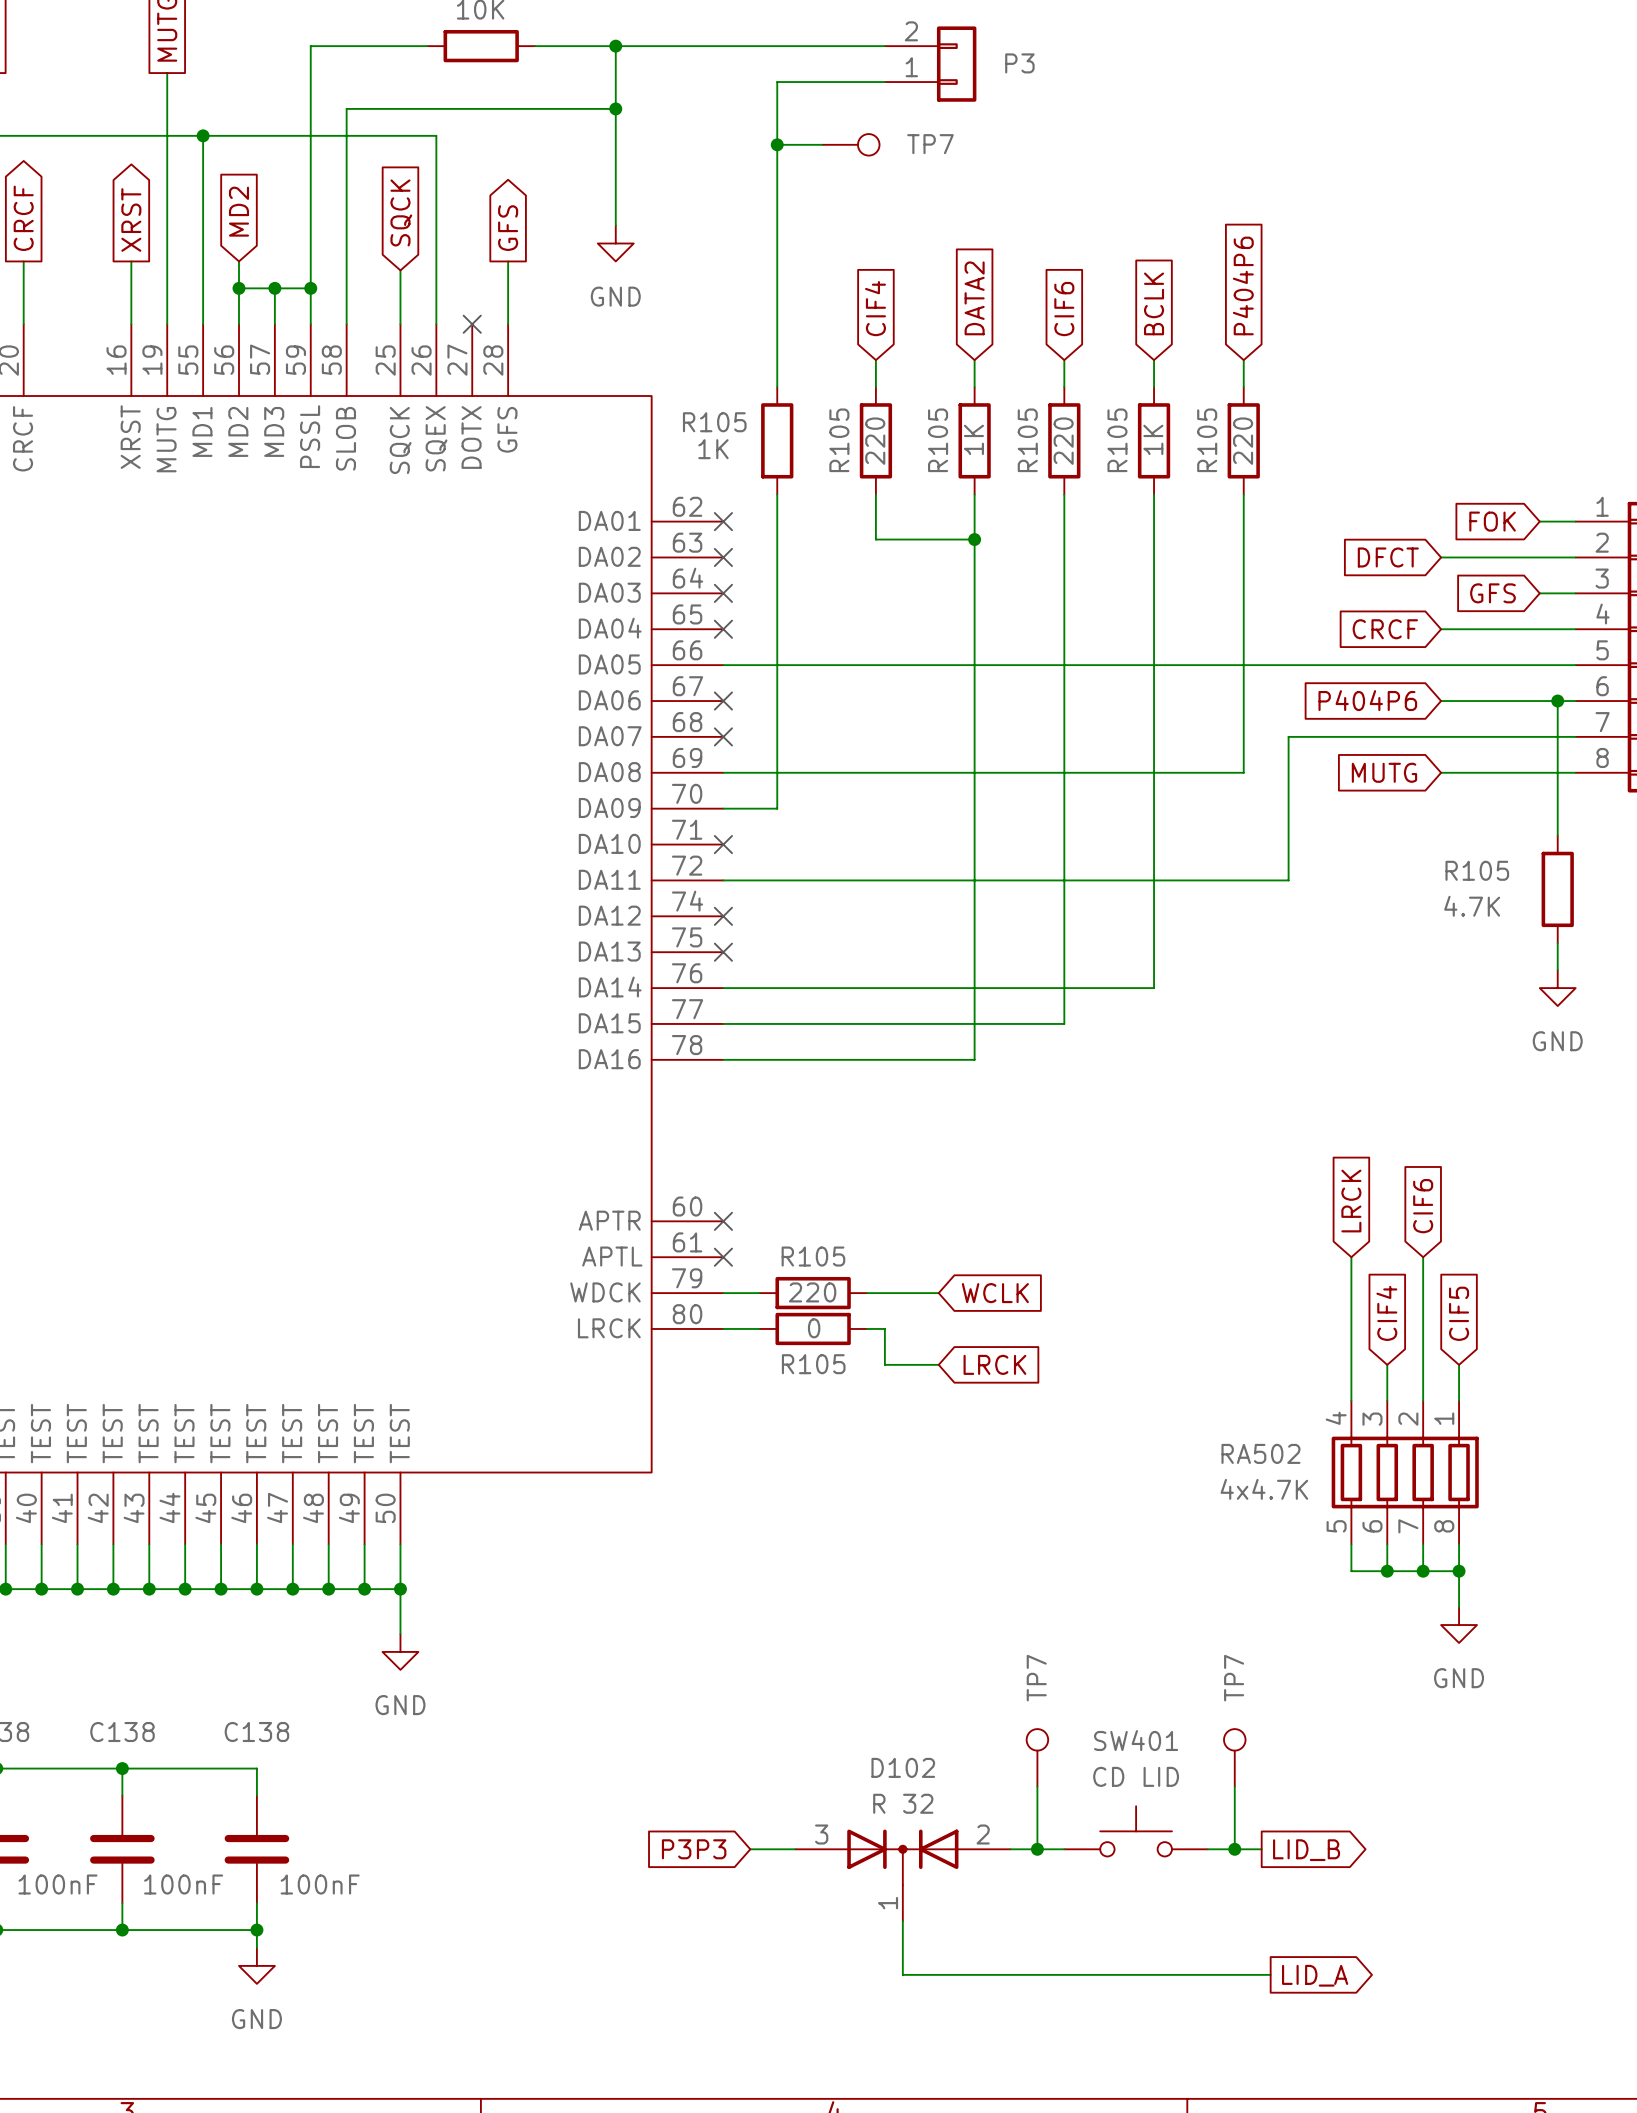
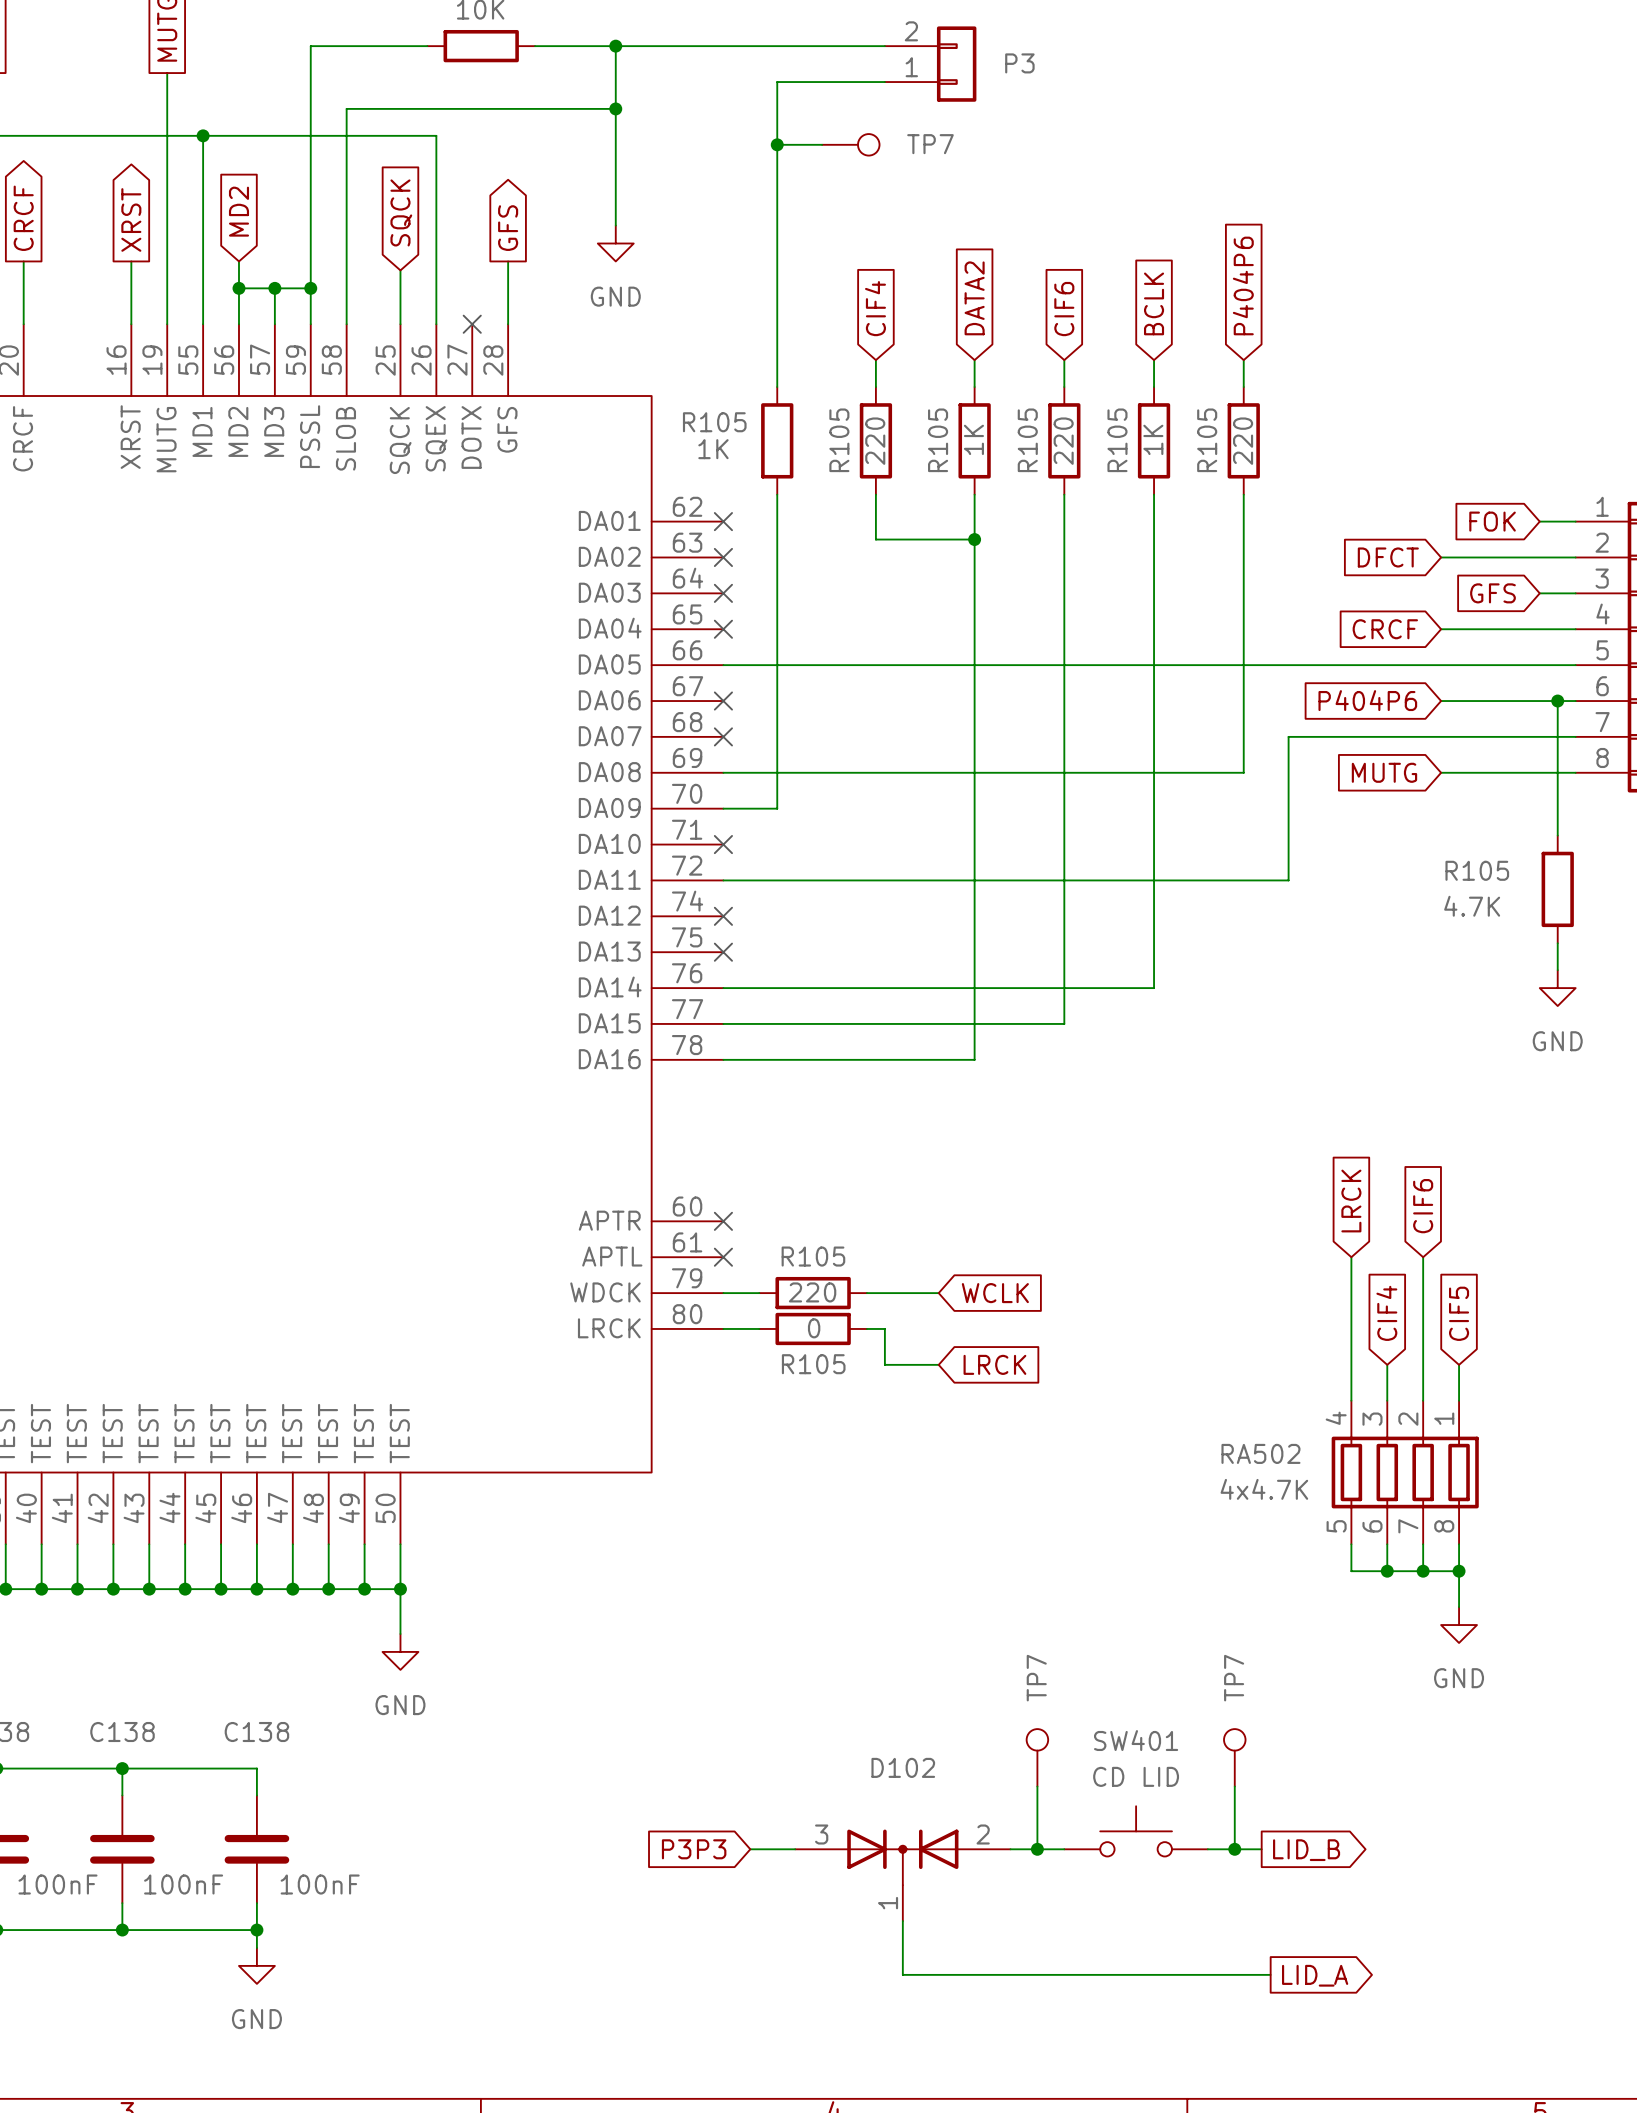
D102 value: R 32 (903, 1803) -> none

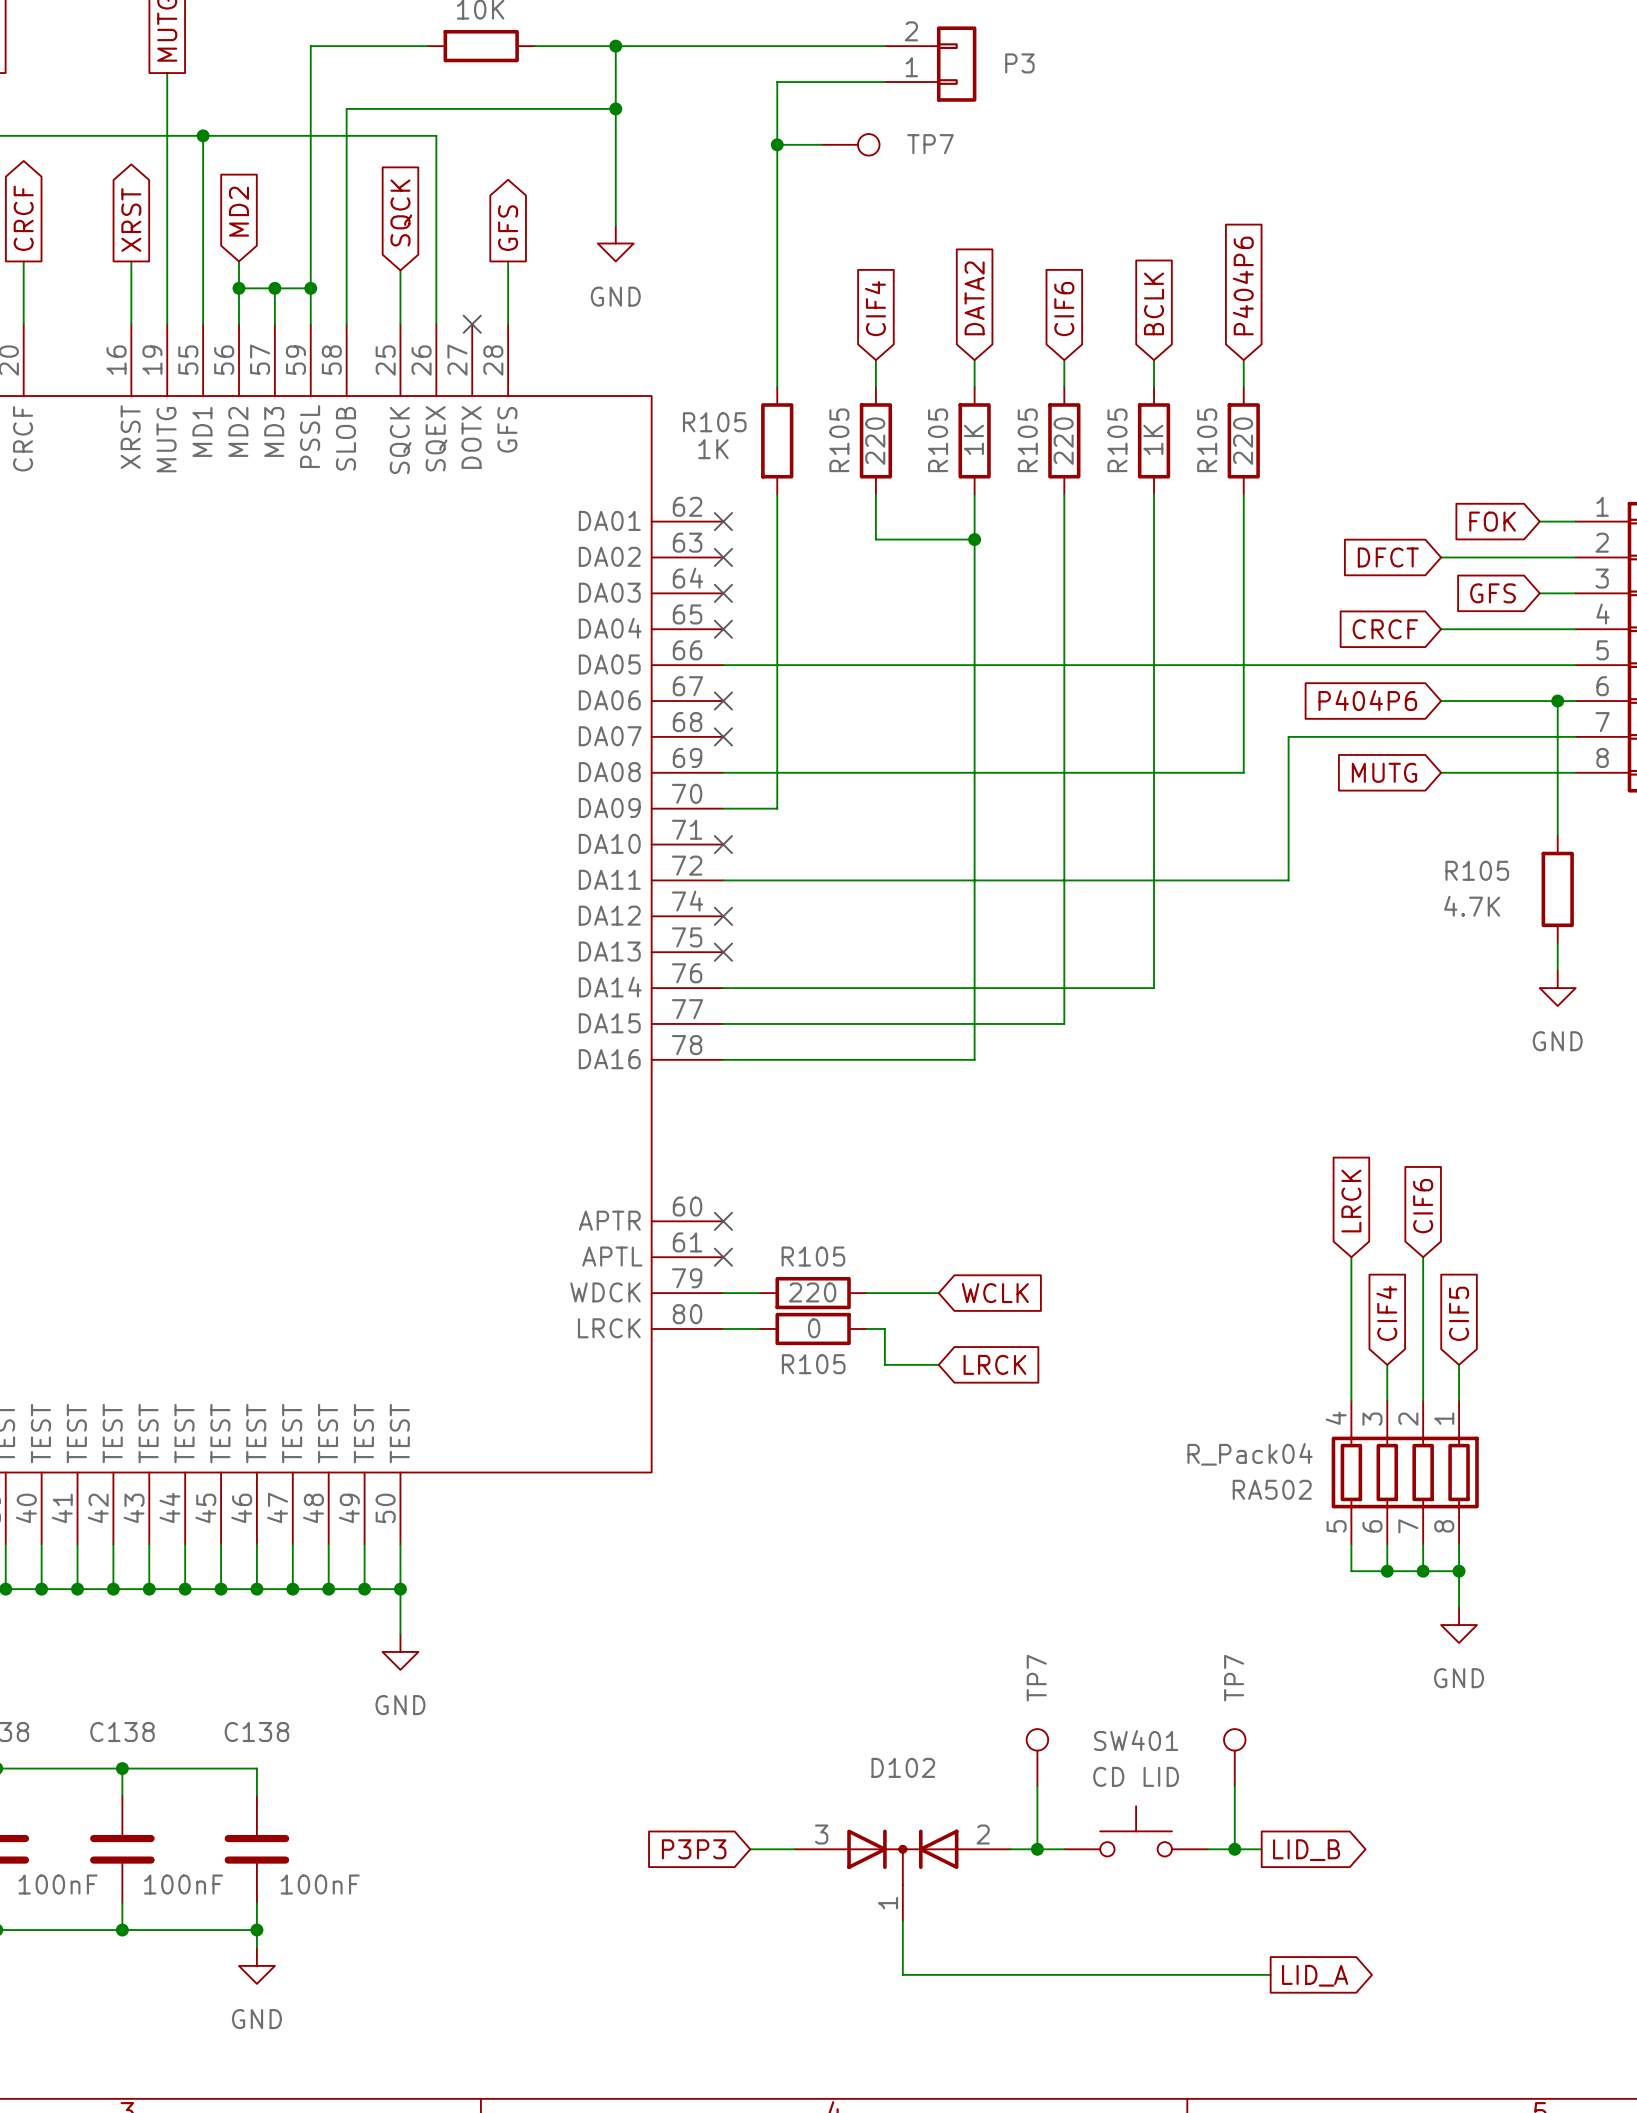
RA502 name position: RA502 (1260, 1453) -> RA502 (1272, 1489)
RA502 value: 4x4.7K (1264, 1489) -> R_Pack04 (1250, 1454)

